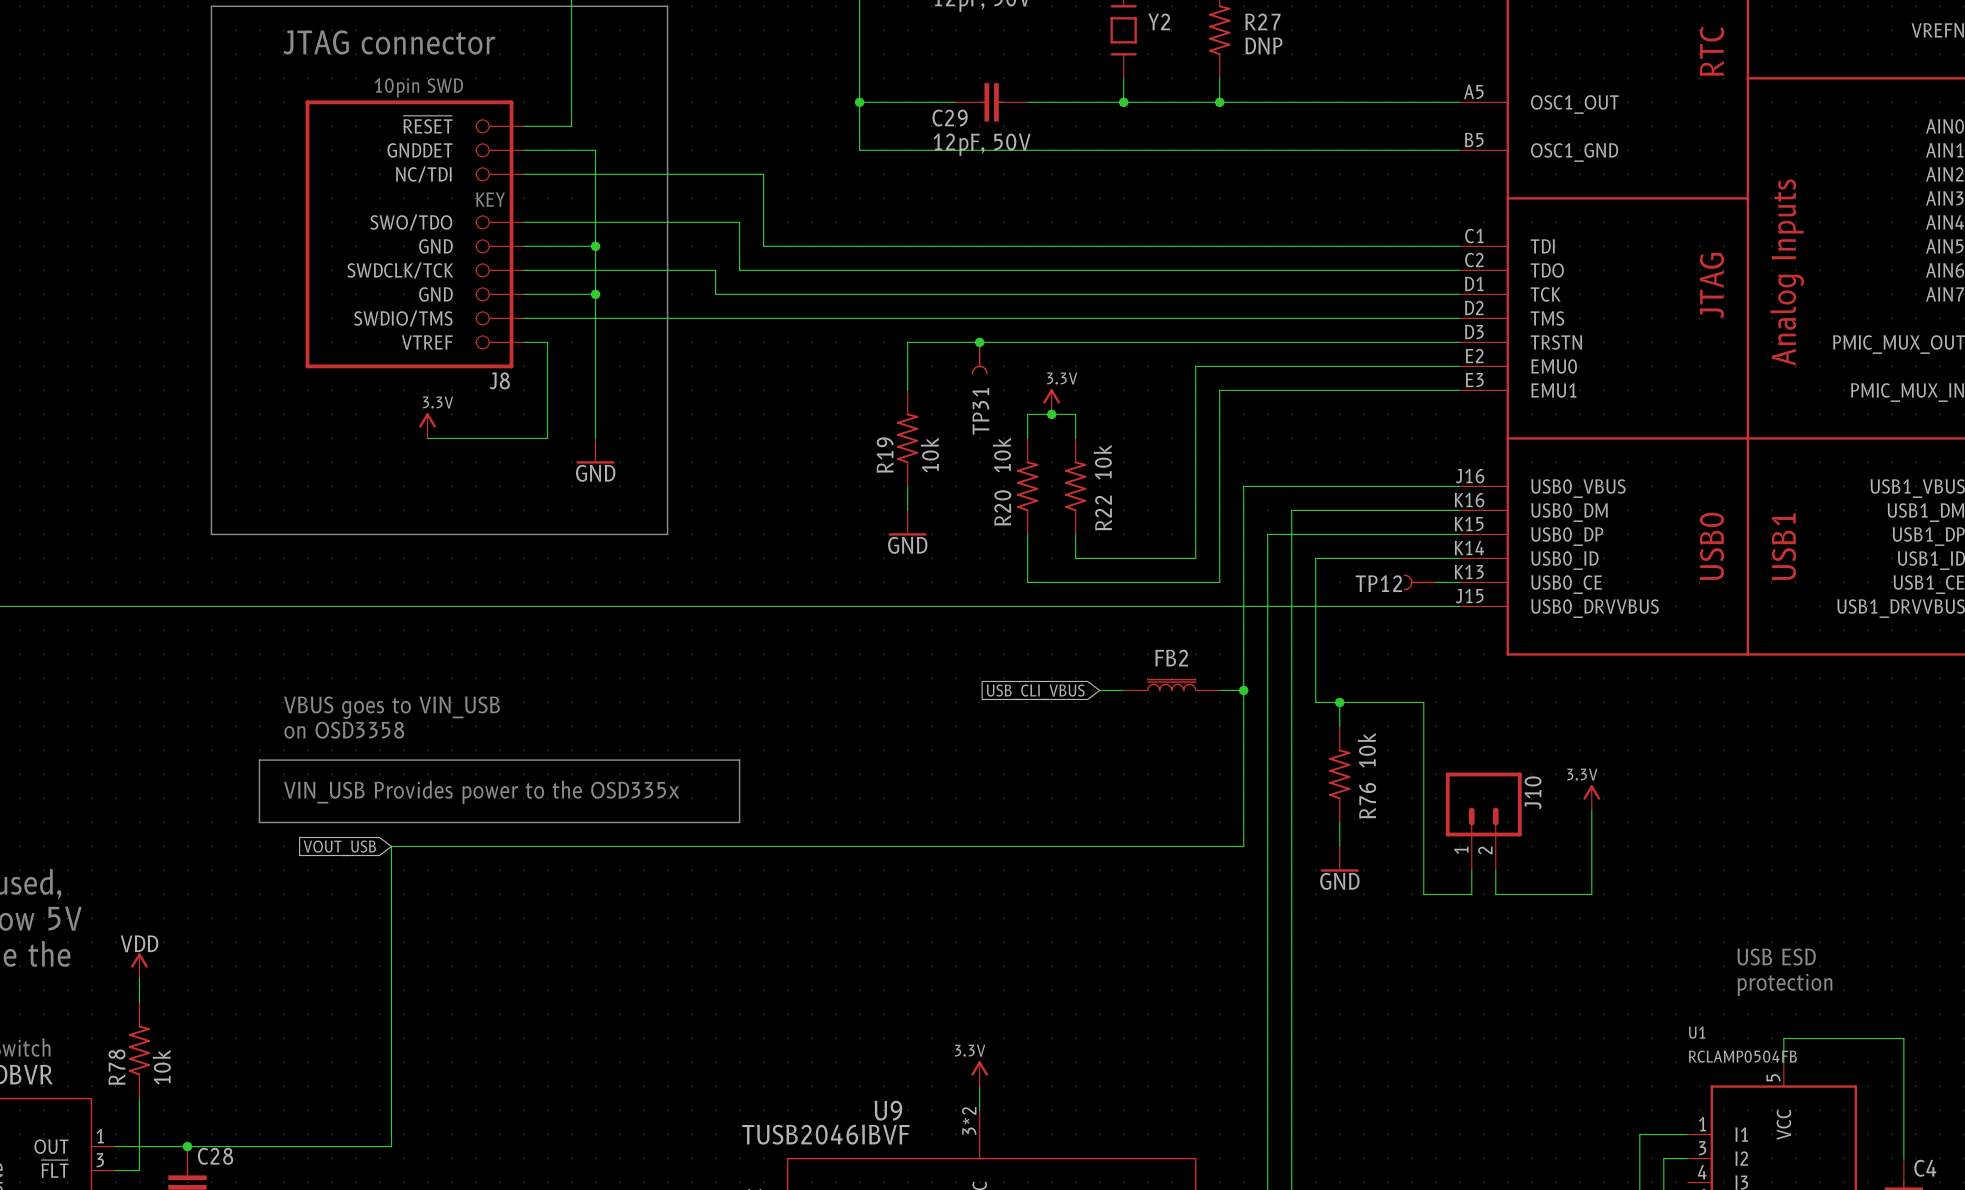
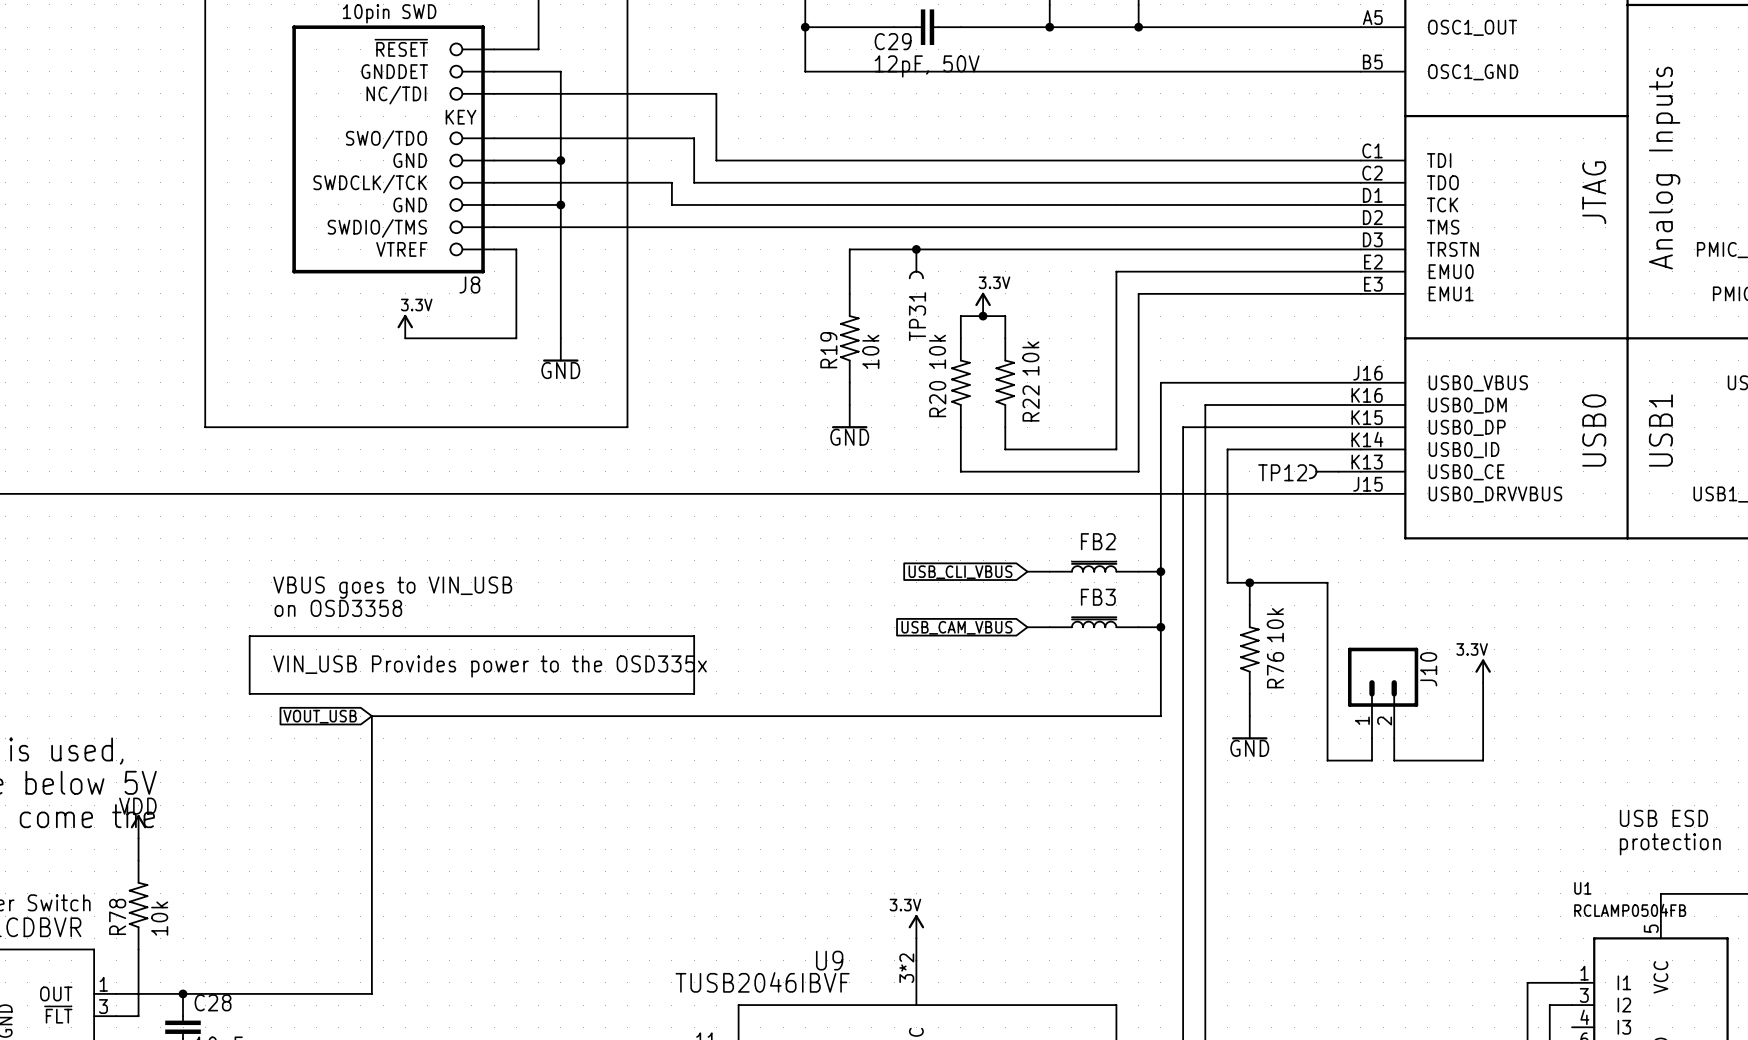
FB3: none -> (1094, 622)
wire: none -> (1027, 627) (1049, 627)
wire: none -> (1138, 627) (1160, 627)
junction: none -> (1160, 627)
global label: none -> USB_CAM_VBUS (956, 627)

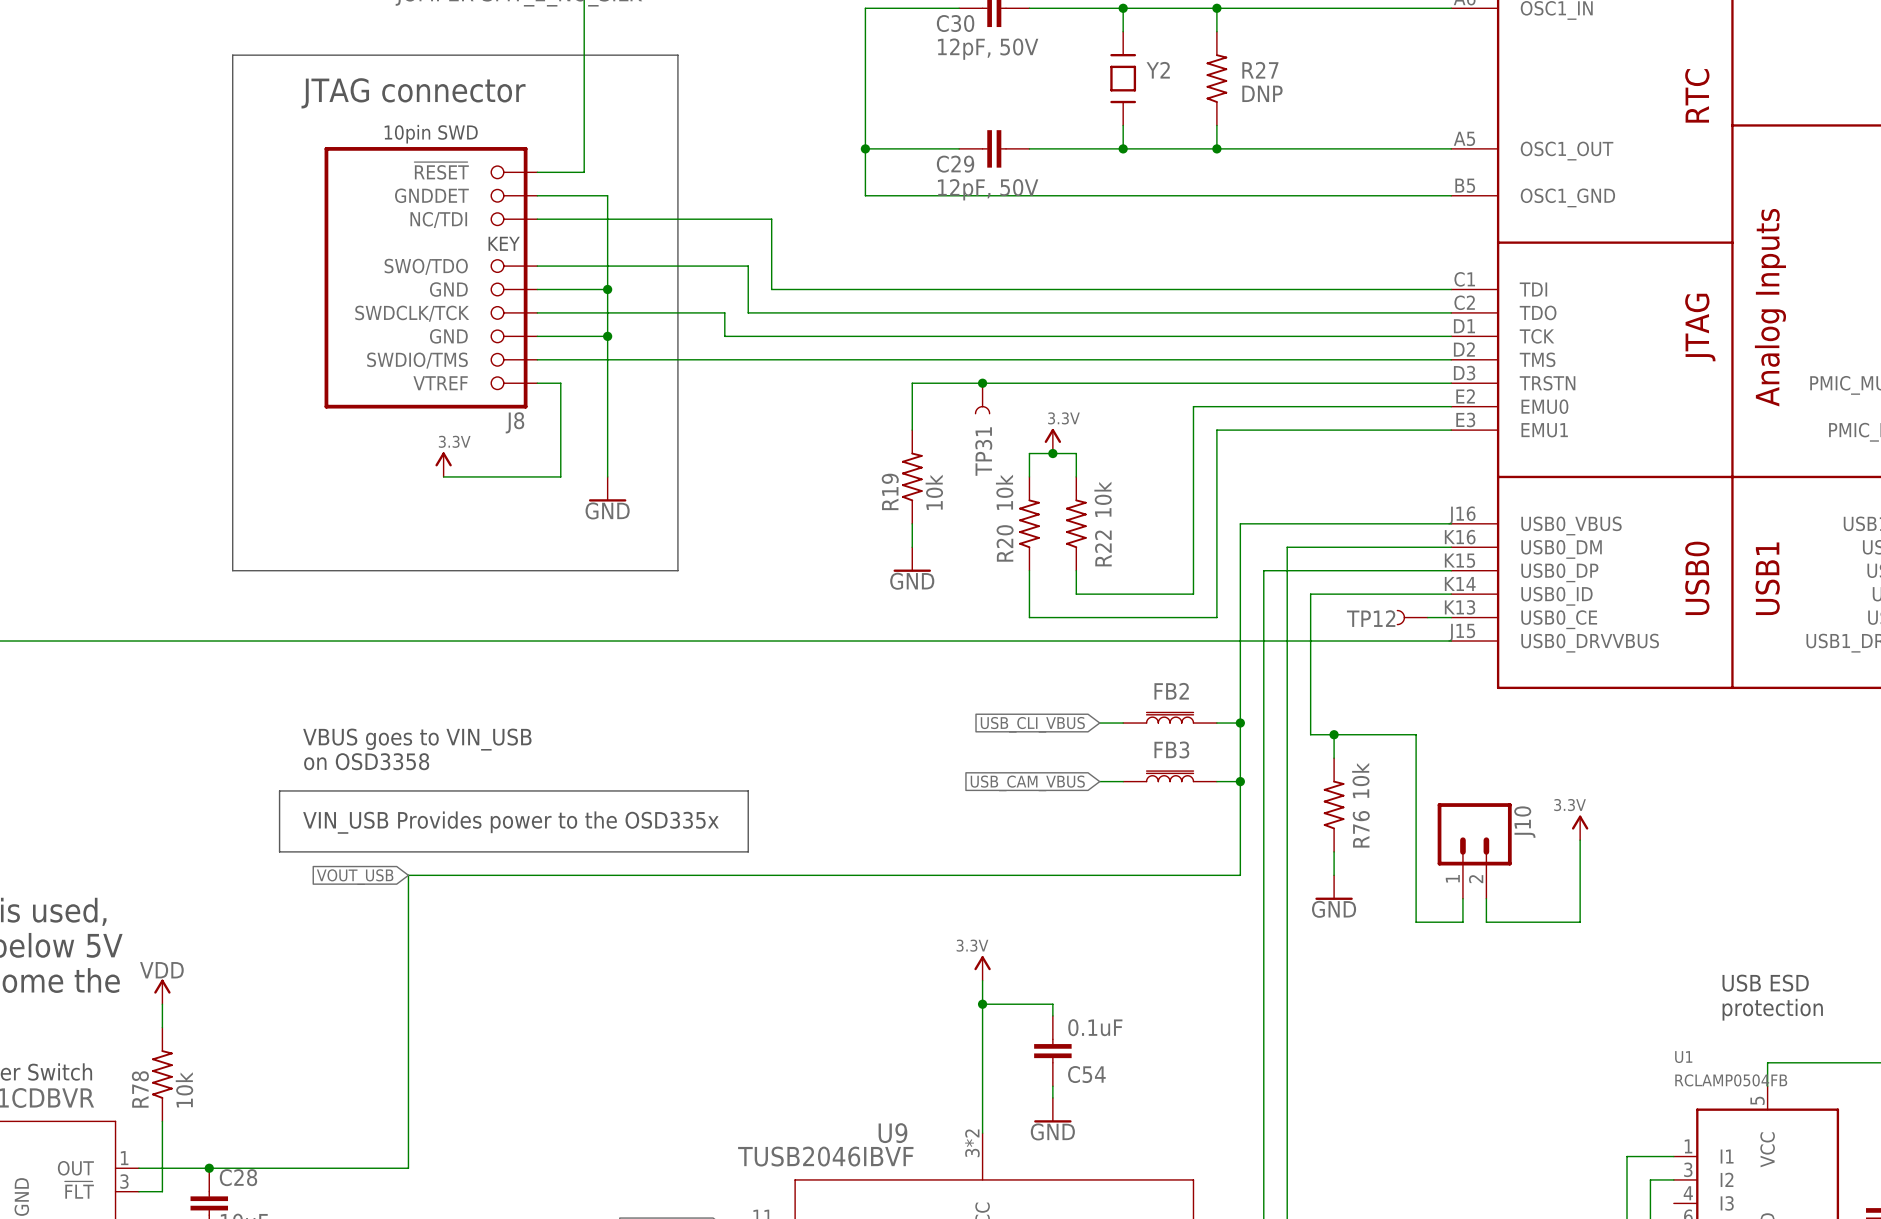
wire: none -> (982, 980) (982, 1109)
wire: none -> (982, 1004) (1052, 1004) (1052, 1015)
junction: none -> (982, 1004)
C54: none -> 0.1uF (1052, 1051)
wire: none -> (1052, 1086) (1052, 1097)
power symbol position: 3.3V (916, 926) -> 3.3V (982, 968)
power symbol: none -> GND (1052, 1110)

